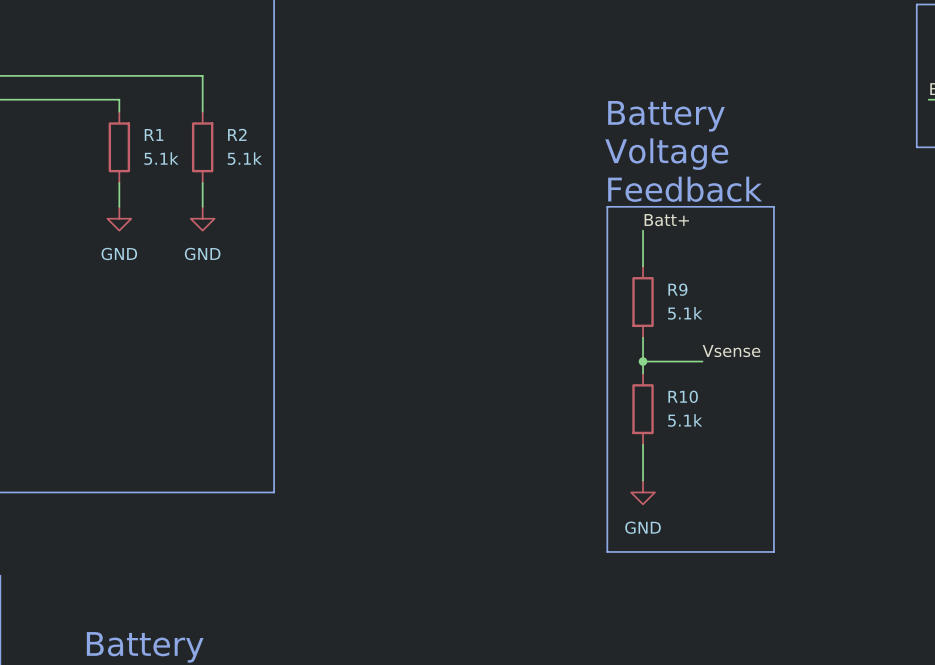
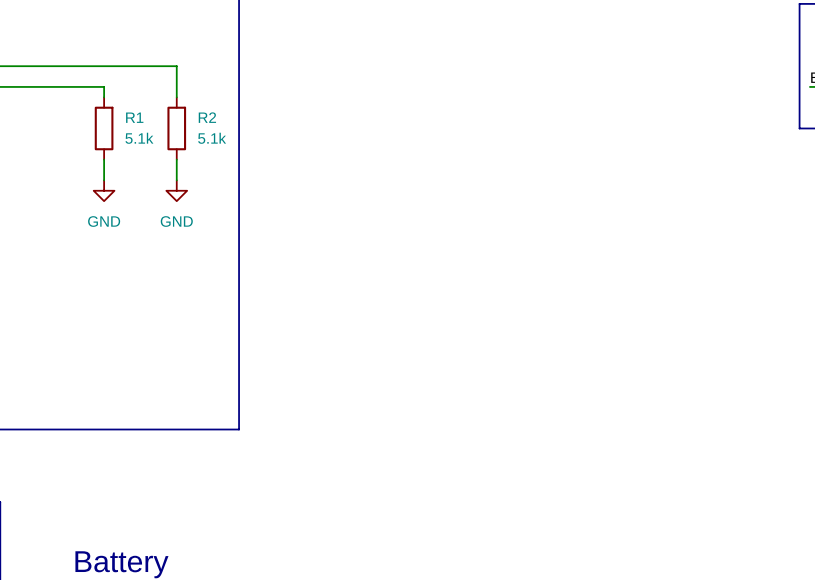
text: Battery (666, 116) -> none
text: Voltage (666, 154) -> none
text: Feedback (685, 189) -> none
line: (607, 206) (773, 206) (773, 551) (607, 551) (607, 206) -> none
label: Batt+ (666, 220) -> none
wire: (643, 230) (643, 266) -> none
R9: 5.1k (643, 302) -> none
wire: (643, 337) (643, 373) -> none
label: Vsense (731, 351) -> none
wire: (643, 361) (702, 361) -> none
junction: (643, 361) -> none
R10: 5.1k (643, 409) -> none
wire: (643, 444) (643, 480) -> none
power symbol: GND (643, 492) -> none

